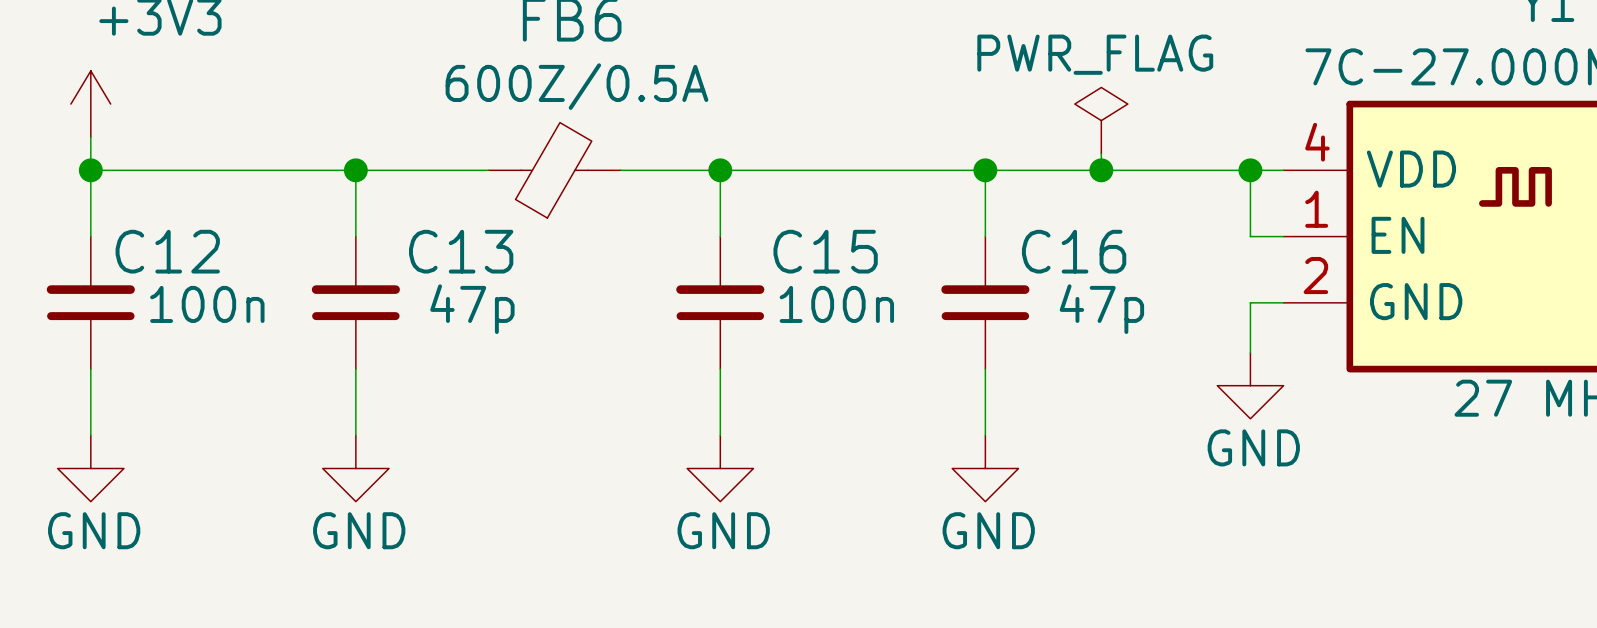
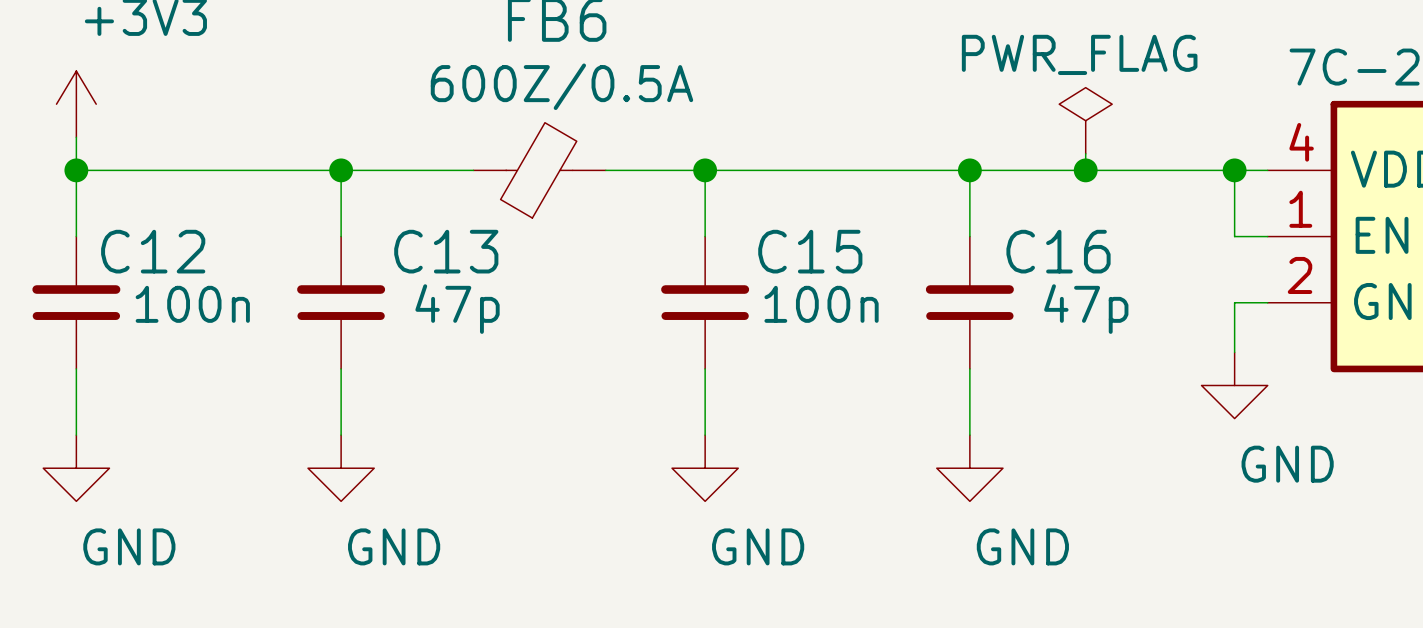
power symbol text position: GND (1253, 447) -> GND (1287, 464)
power symbol text position: GND (94, 530) -> GND (129, 546)
power symbol text position: GND (359, 530) -> GND (394, 546)
power symbol text position: GND (723, 530) -> GND (758, 546)
power symbol text position: GND (988, 530) -> GND (1022, 546)

